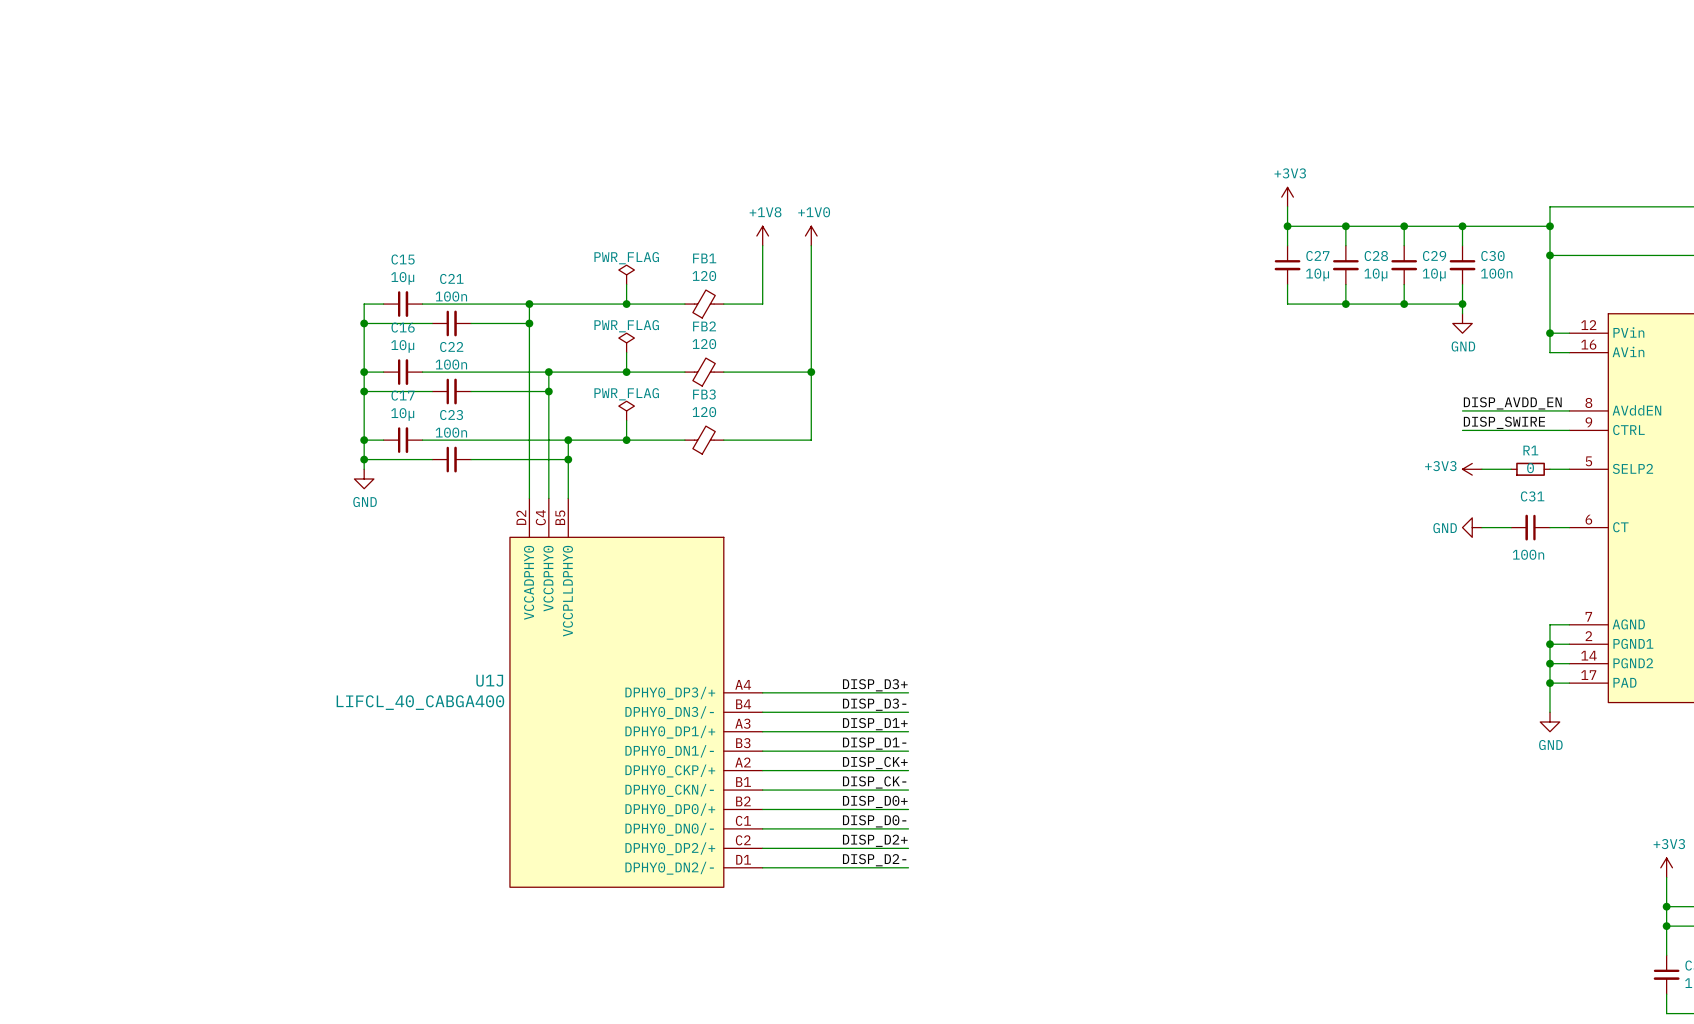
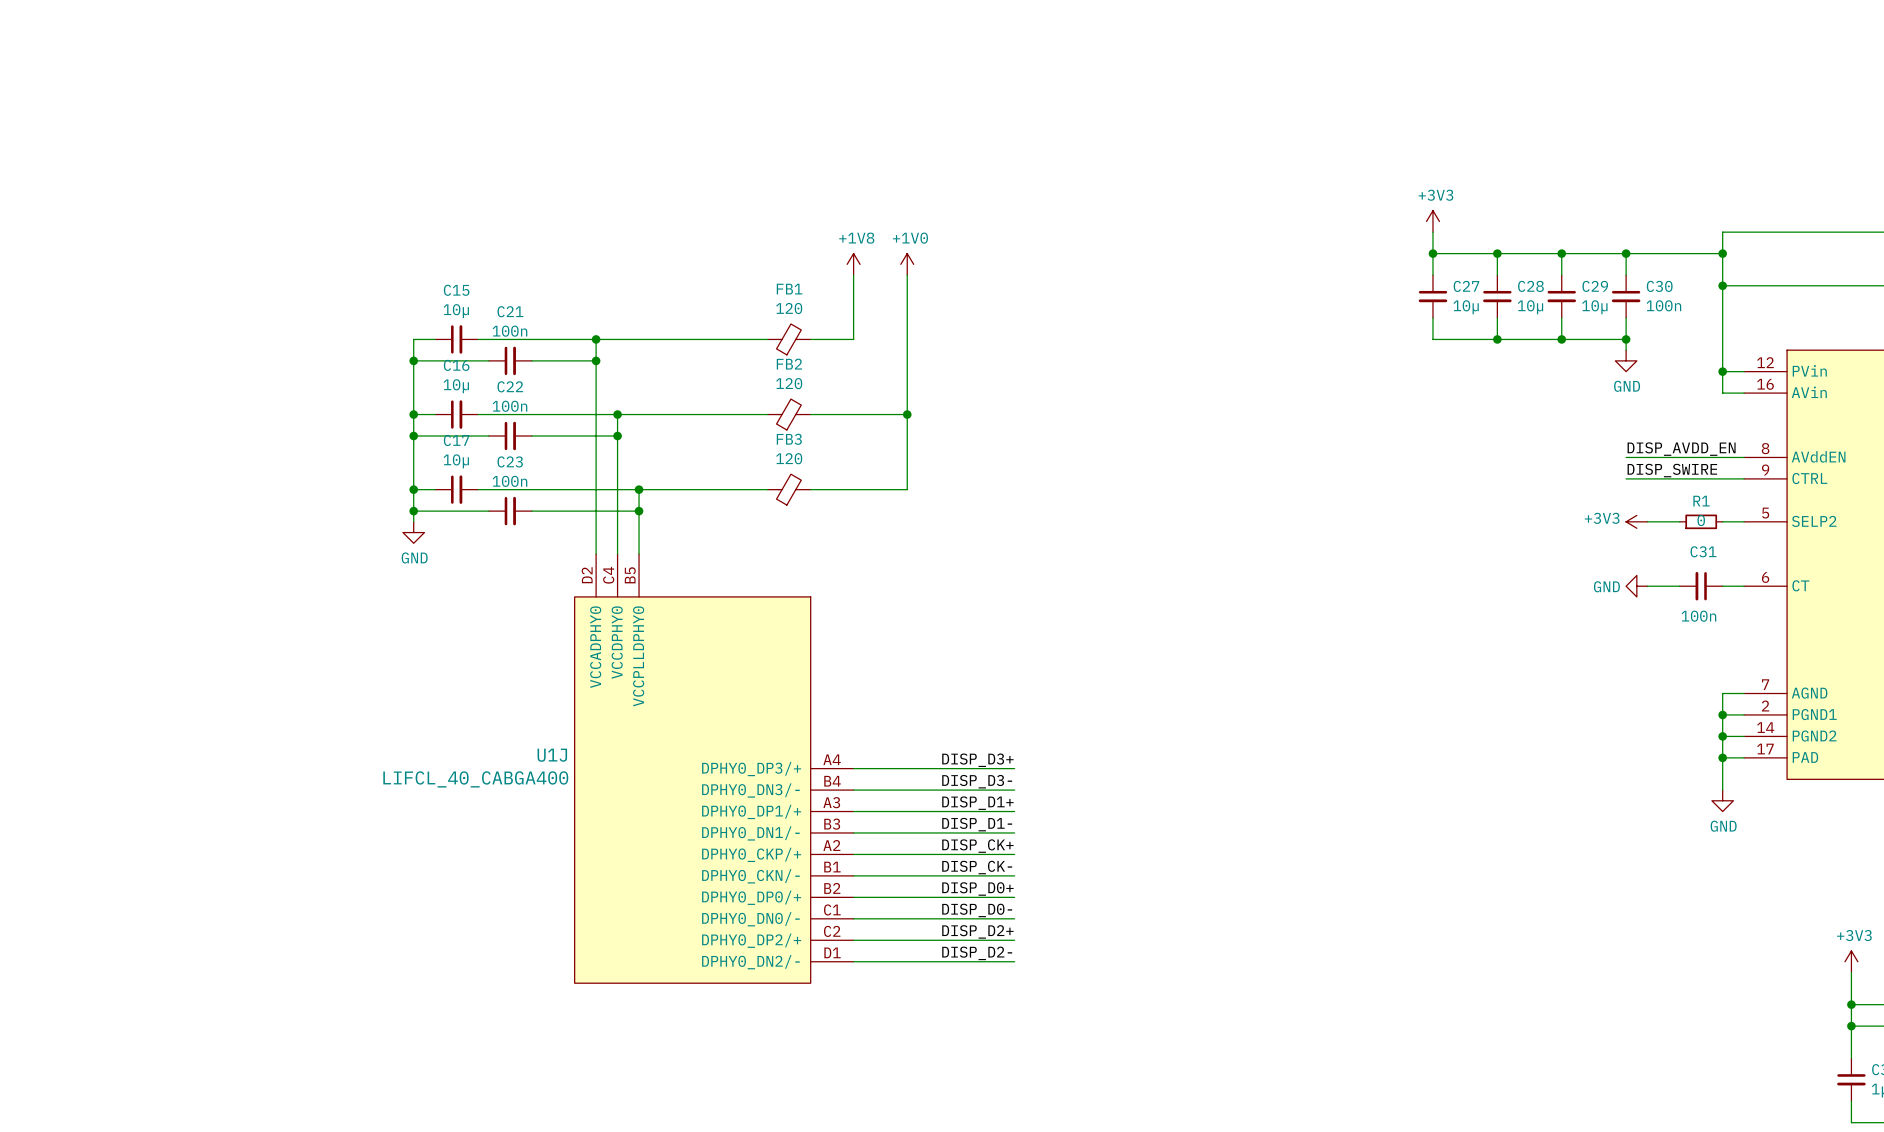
power symbol: PWR_FLAG (626, 274) -> none
wire: (626, 284) (626, 304) -> none
junction: (626, 304) -> none
power symbol: PWR_FLAG (626, 342) -> none
wire: (626, 352) (626, 372) -> none
junction: (626, 372) -> none
power symbol: PWR_FLAG (626, 410) -> none
wire: (626, 420) (626, 440) -> none
junction: (626, 440) -> none

